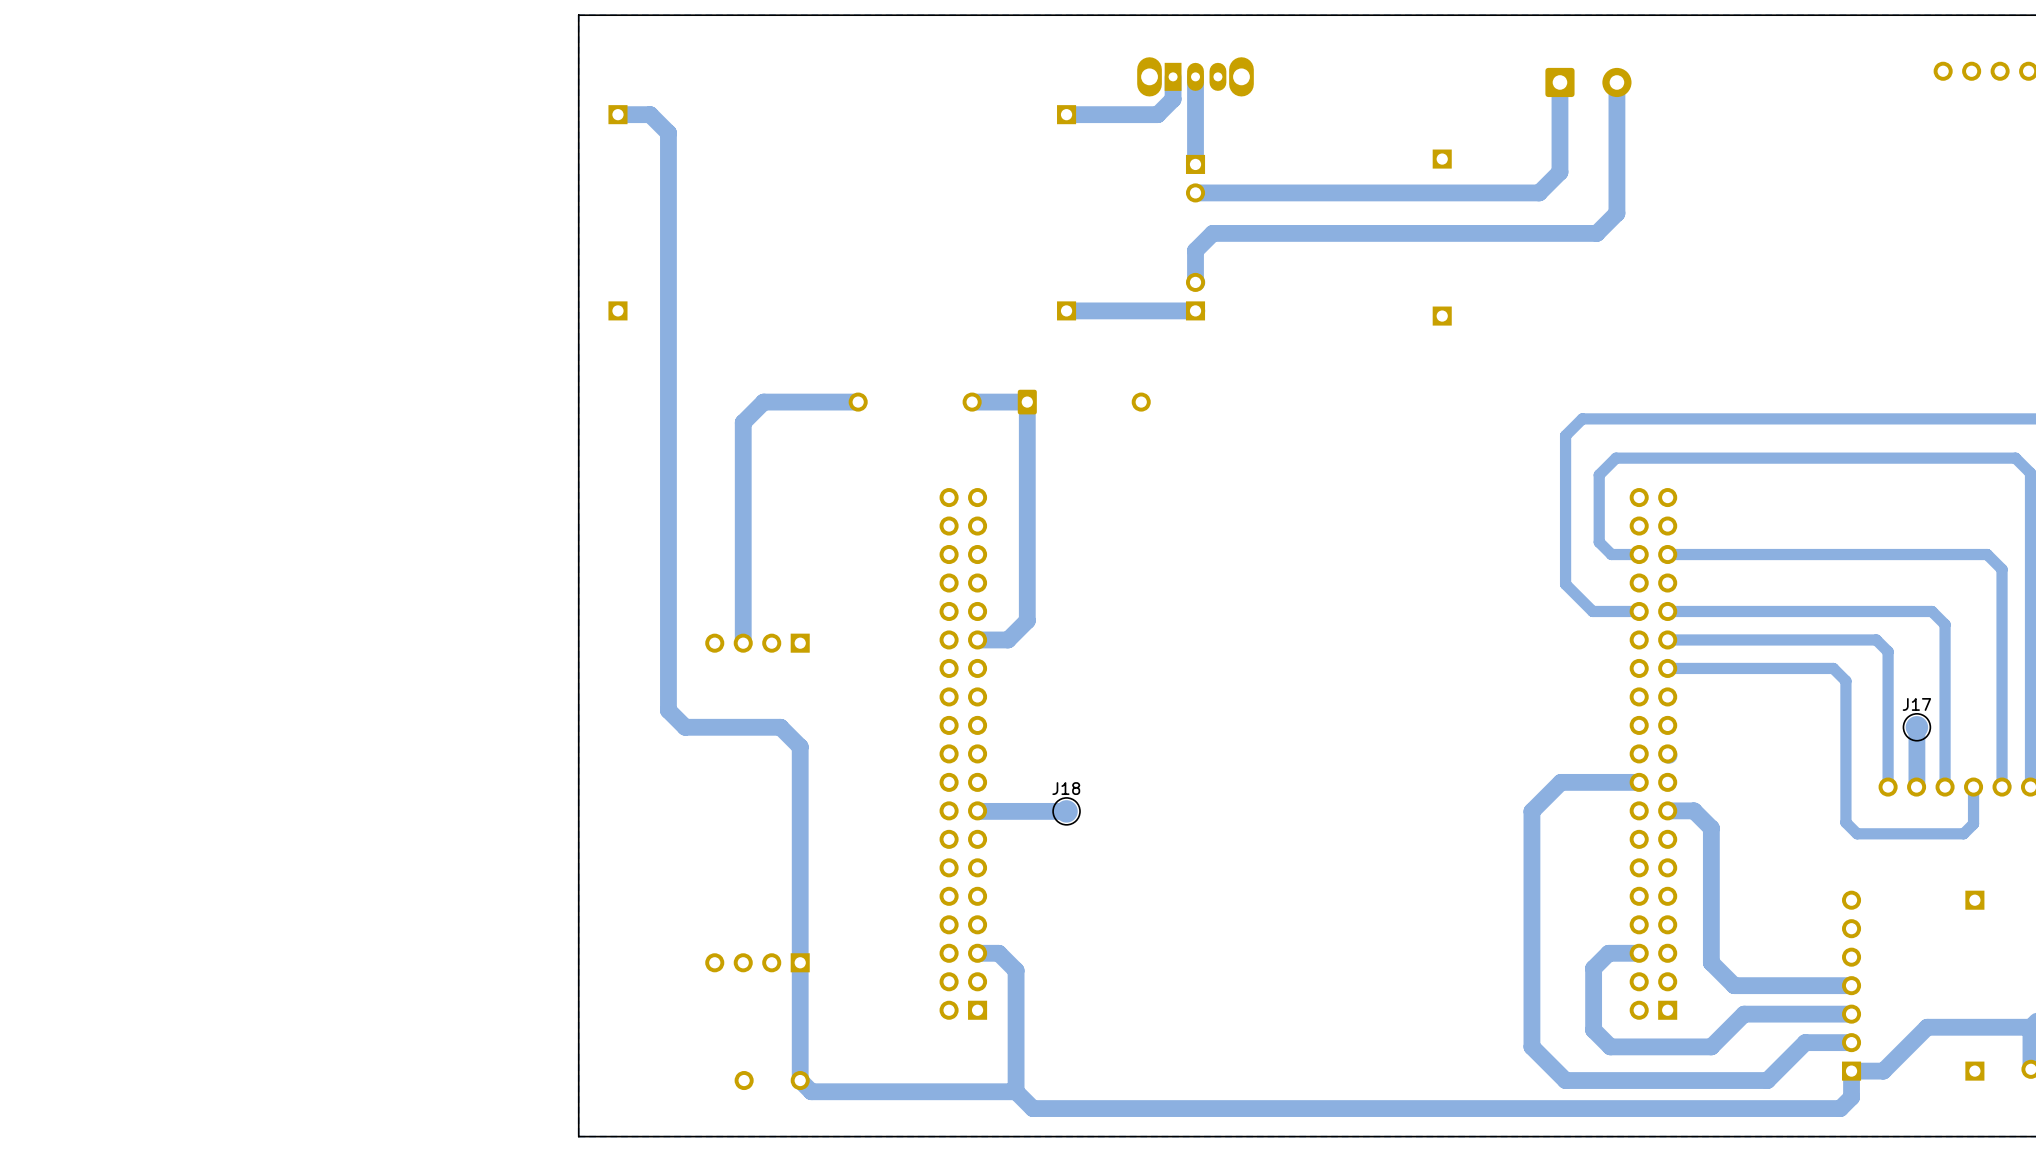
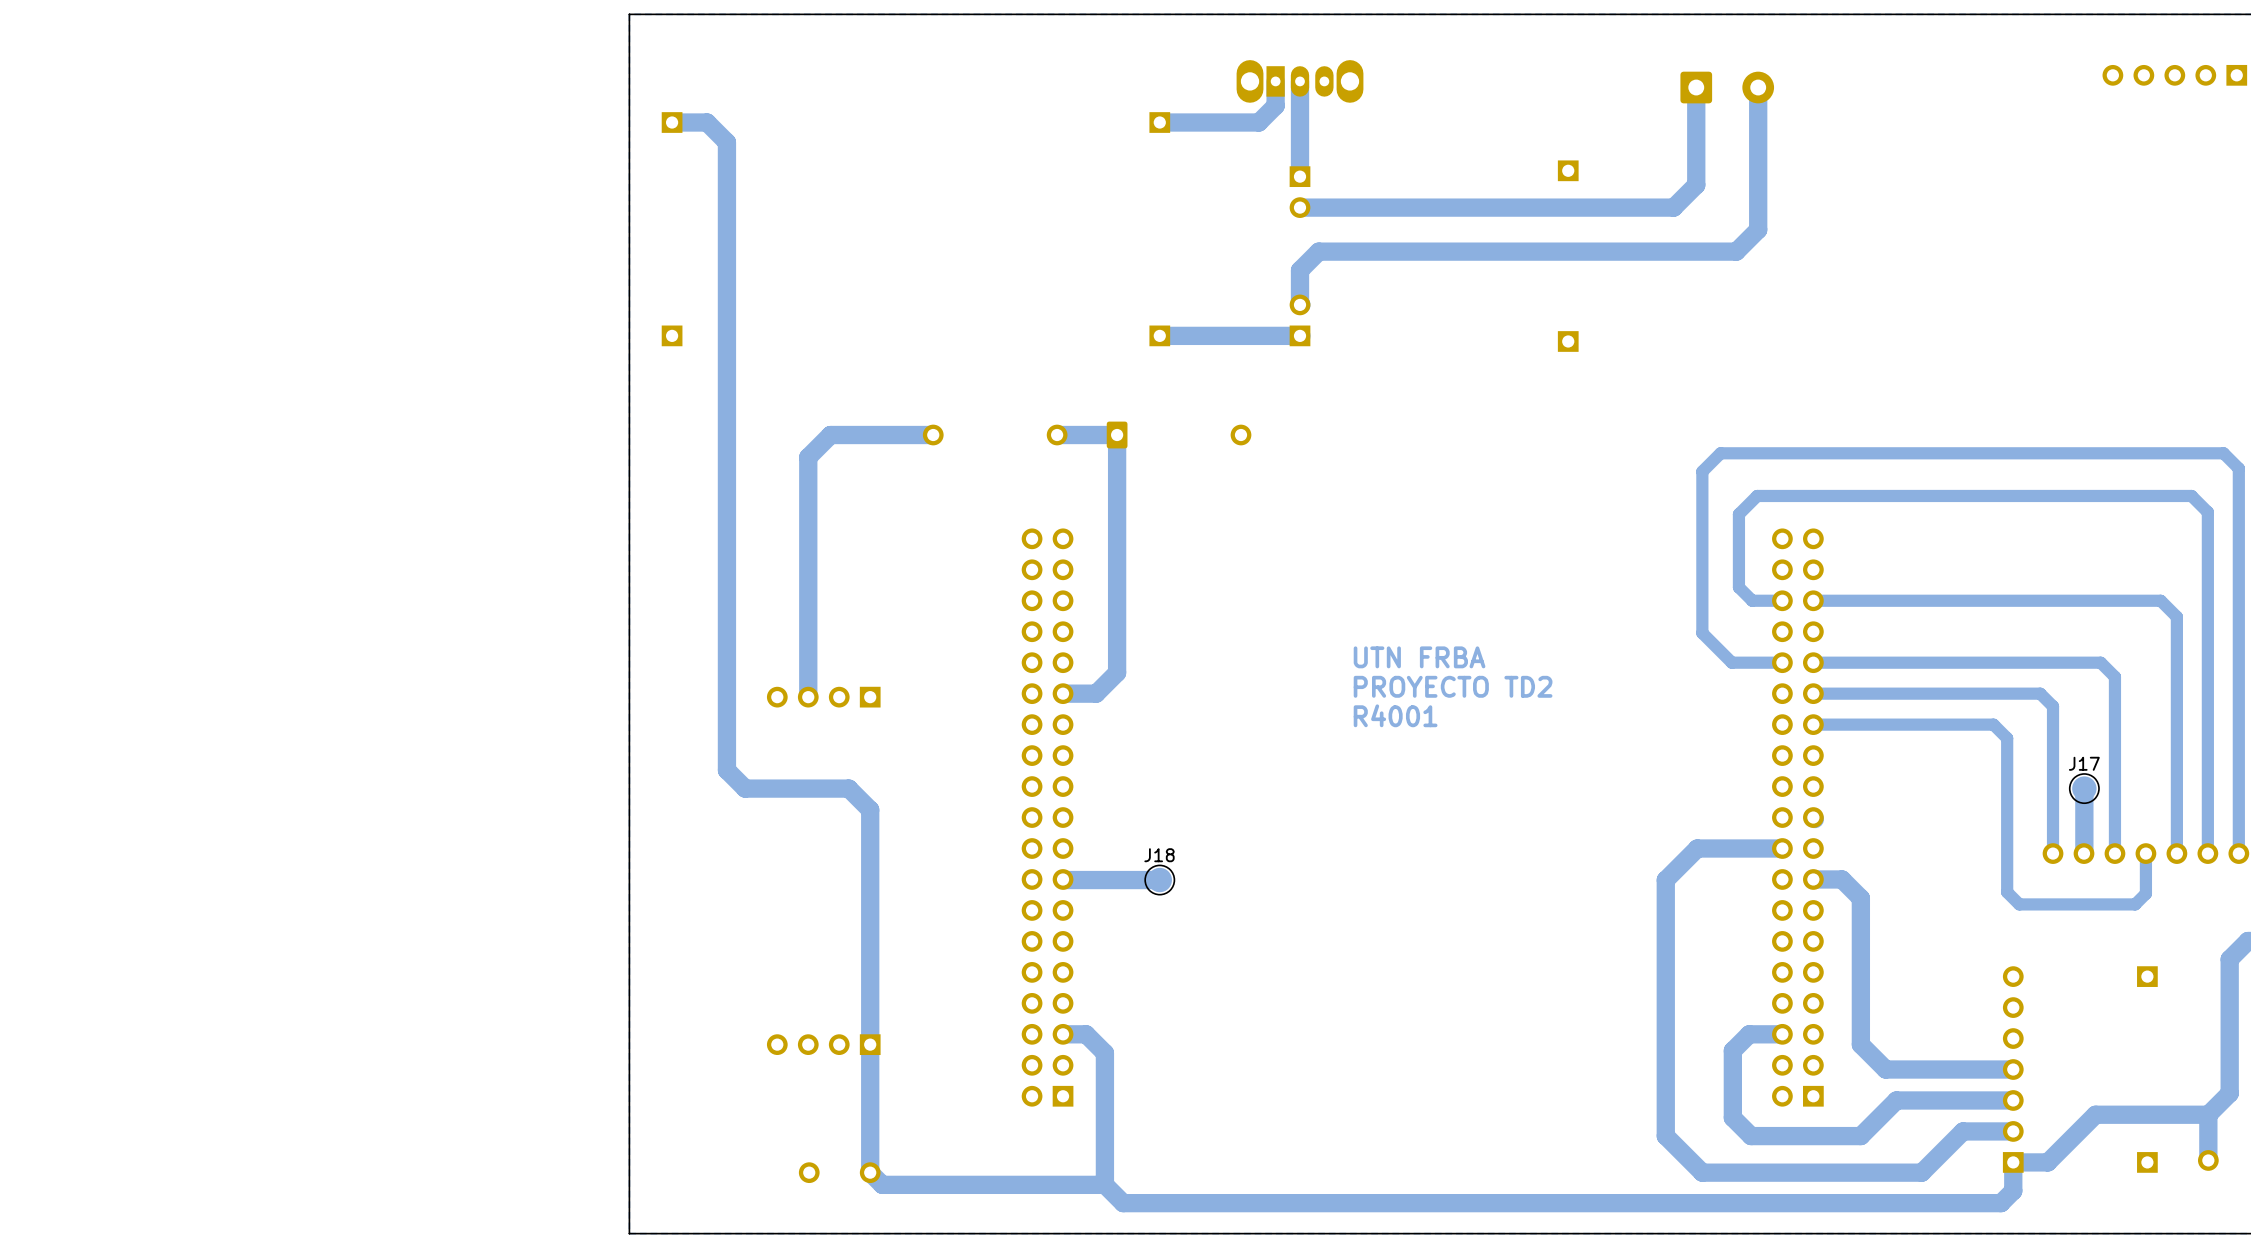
text: none -> UTN FRBA (1419, 657)
text: none -> PROYECTO TD2 (1453, 686)
text: none -> R4001 (1395, 715)

